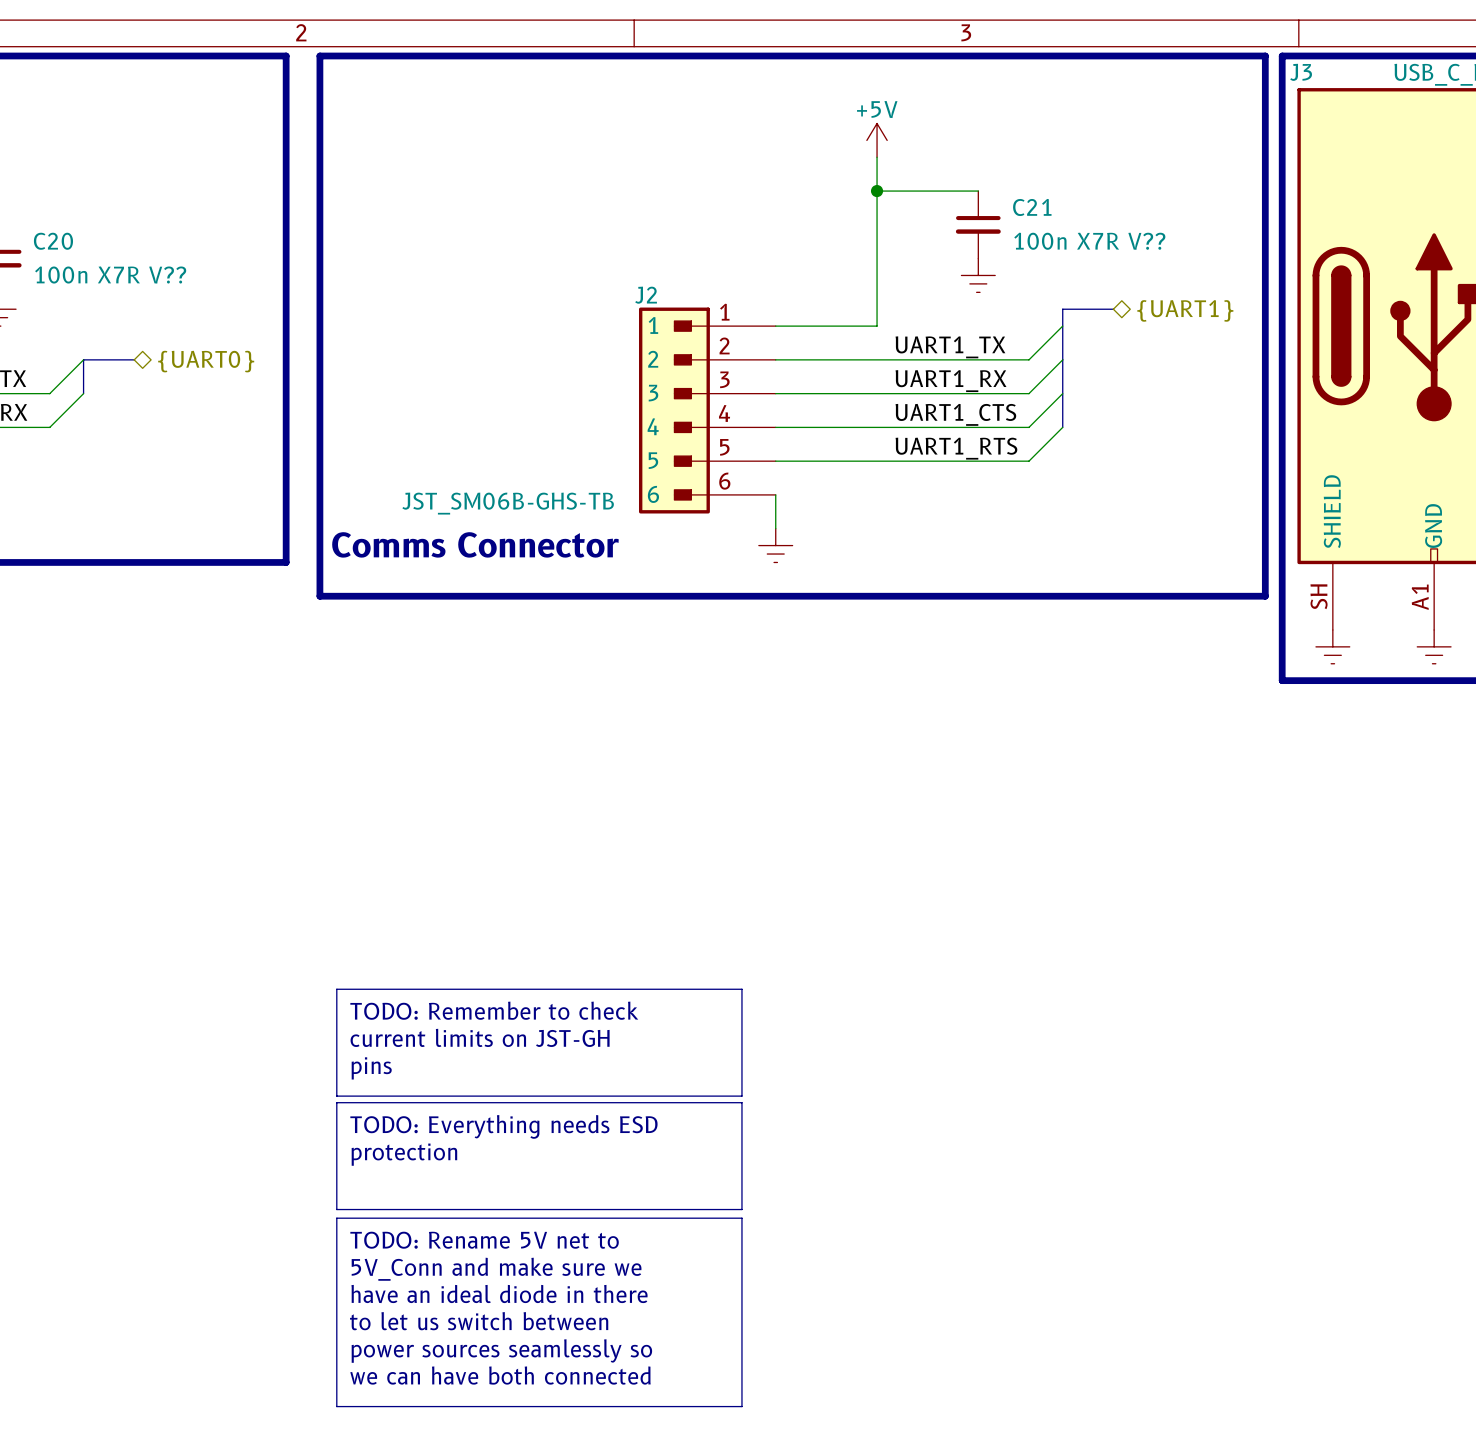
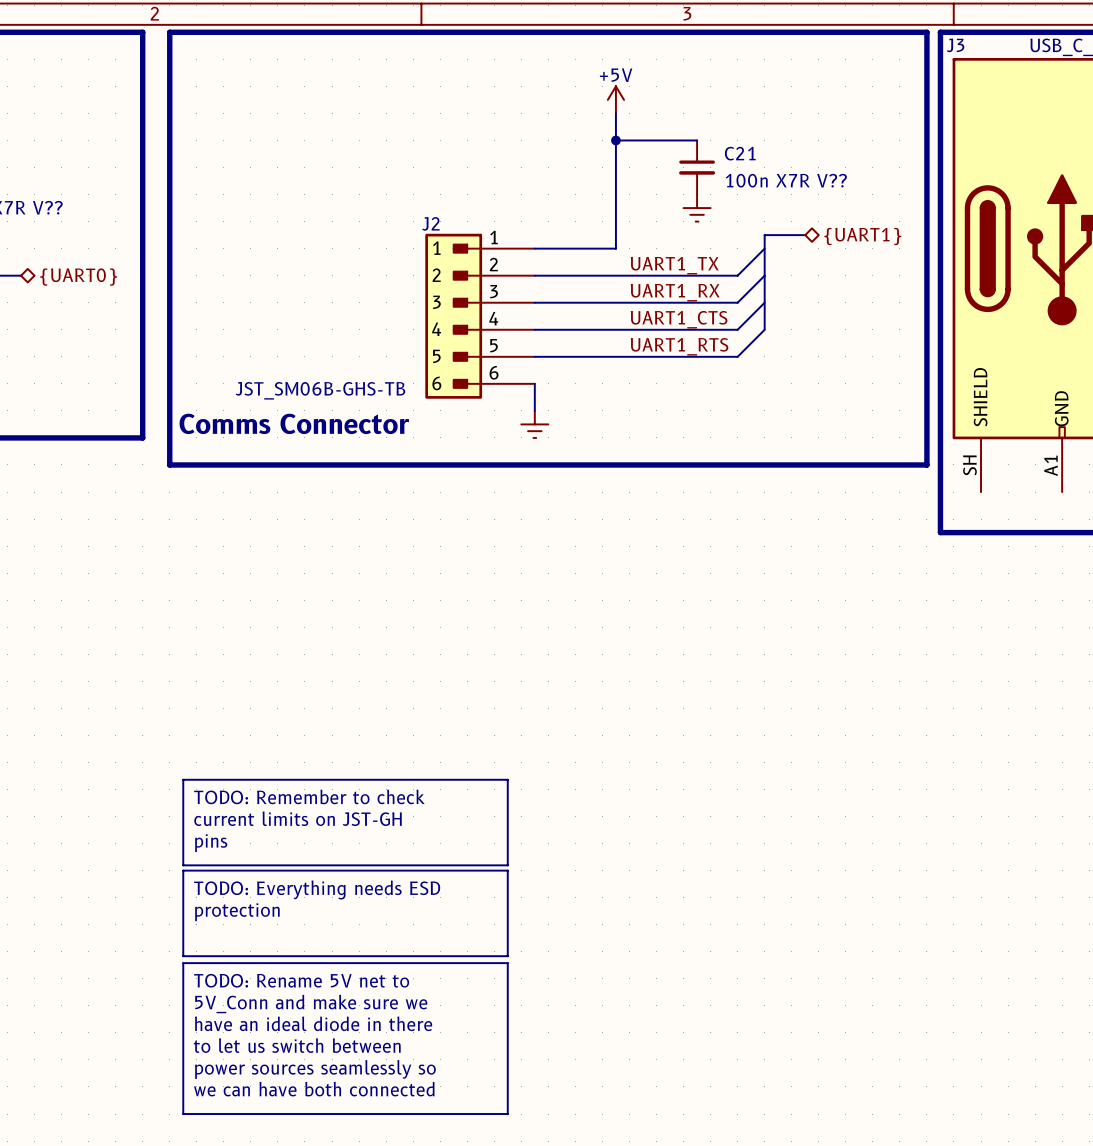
power symbol: (1332, 646) -> none
power symbol: (1434, 646) -> none

